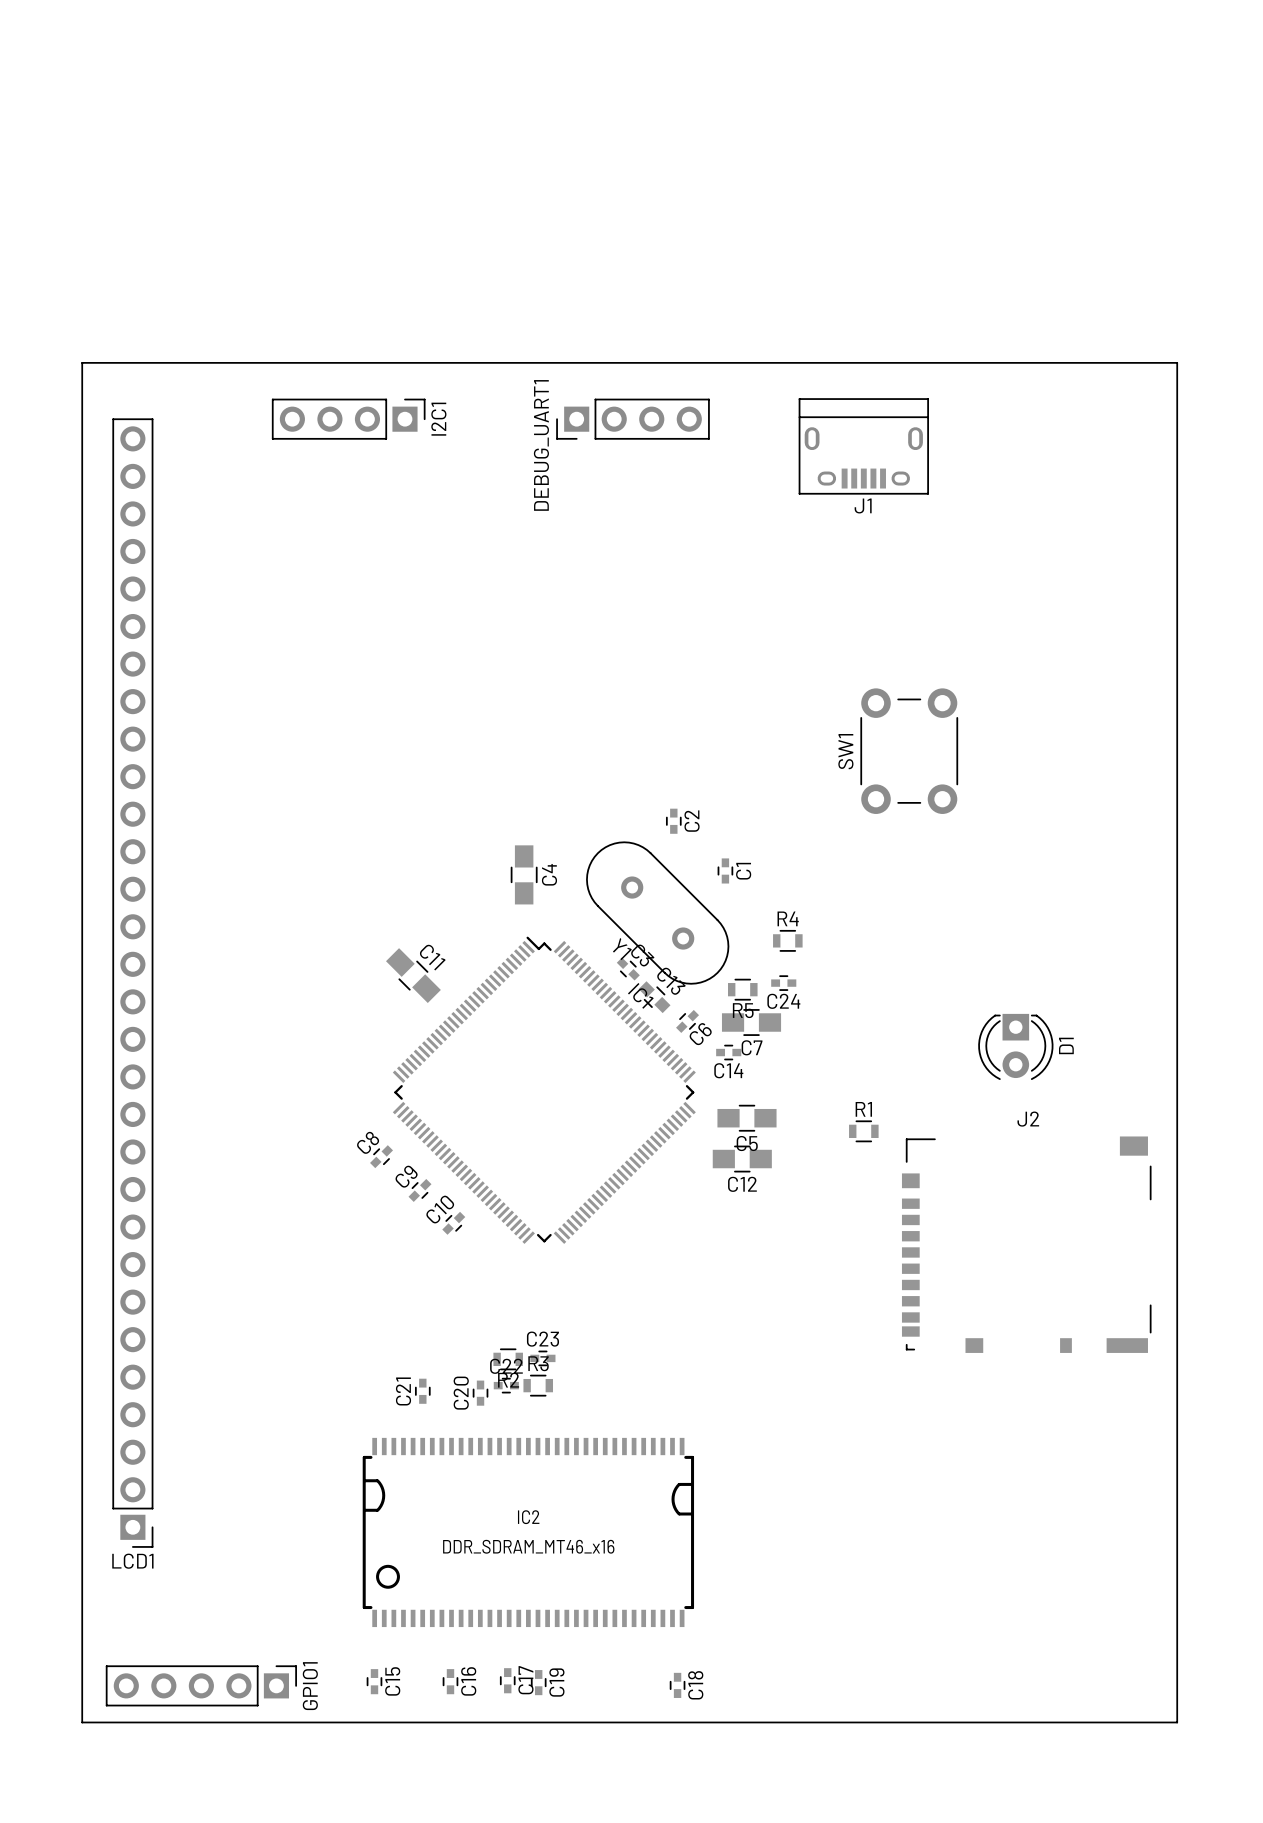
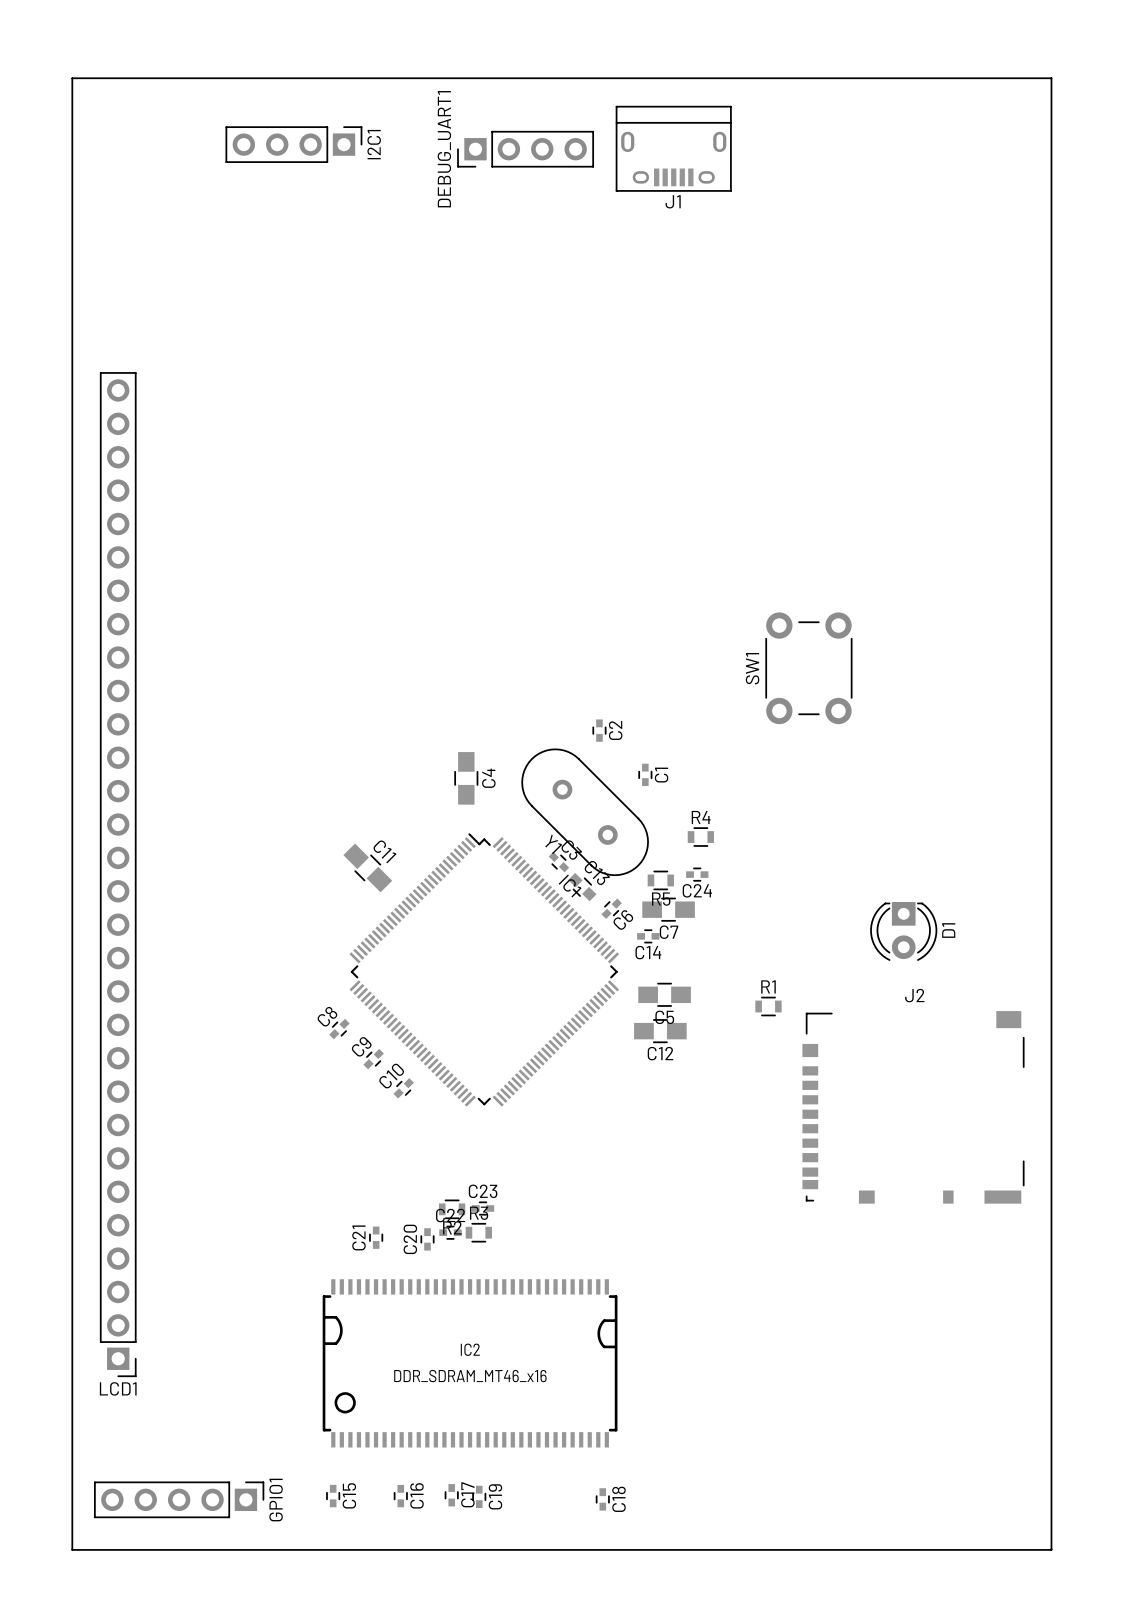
board edge: (82, 362) (1177, 362) (1177, 1722) (82, 1722) (82, 362) -> (72, 78) (72, 1549) (1051, 1549) (1051, 78) (72, 78)
I2C1 position: (348, 419) -> (293, 144)
DEBUG_UART1 position: (632, 419) -> (525, 149)
DEBUG_UART1 name position: DEBUG_UART1 (541, 445) -> DEBUG_UART1 (444, 149)
J1 position: (863, 446) -> (673, 148)

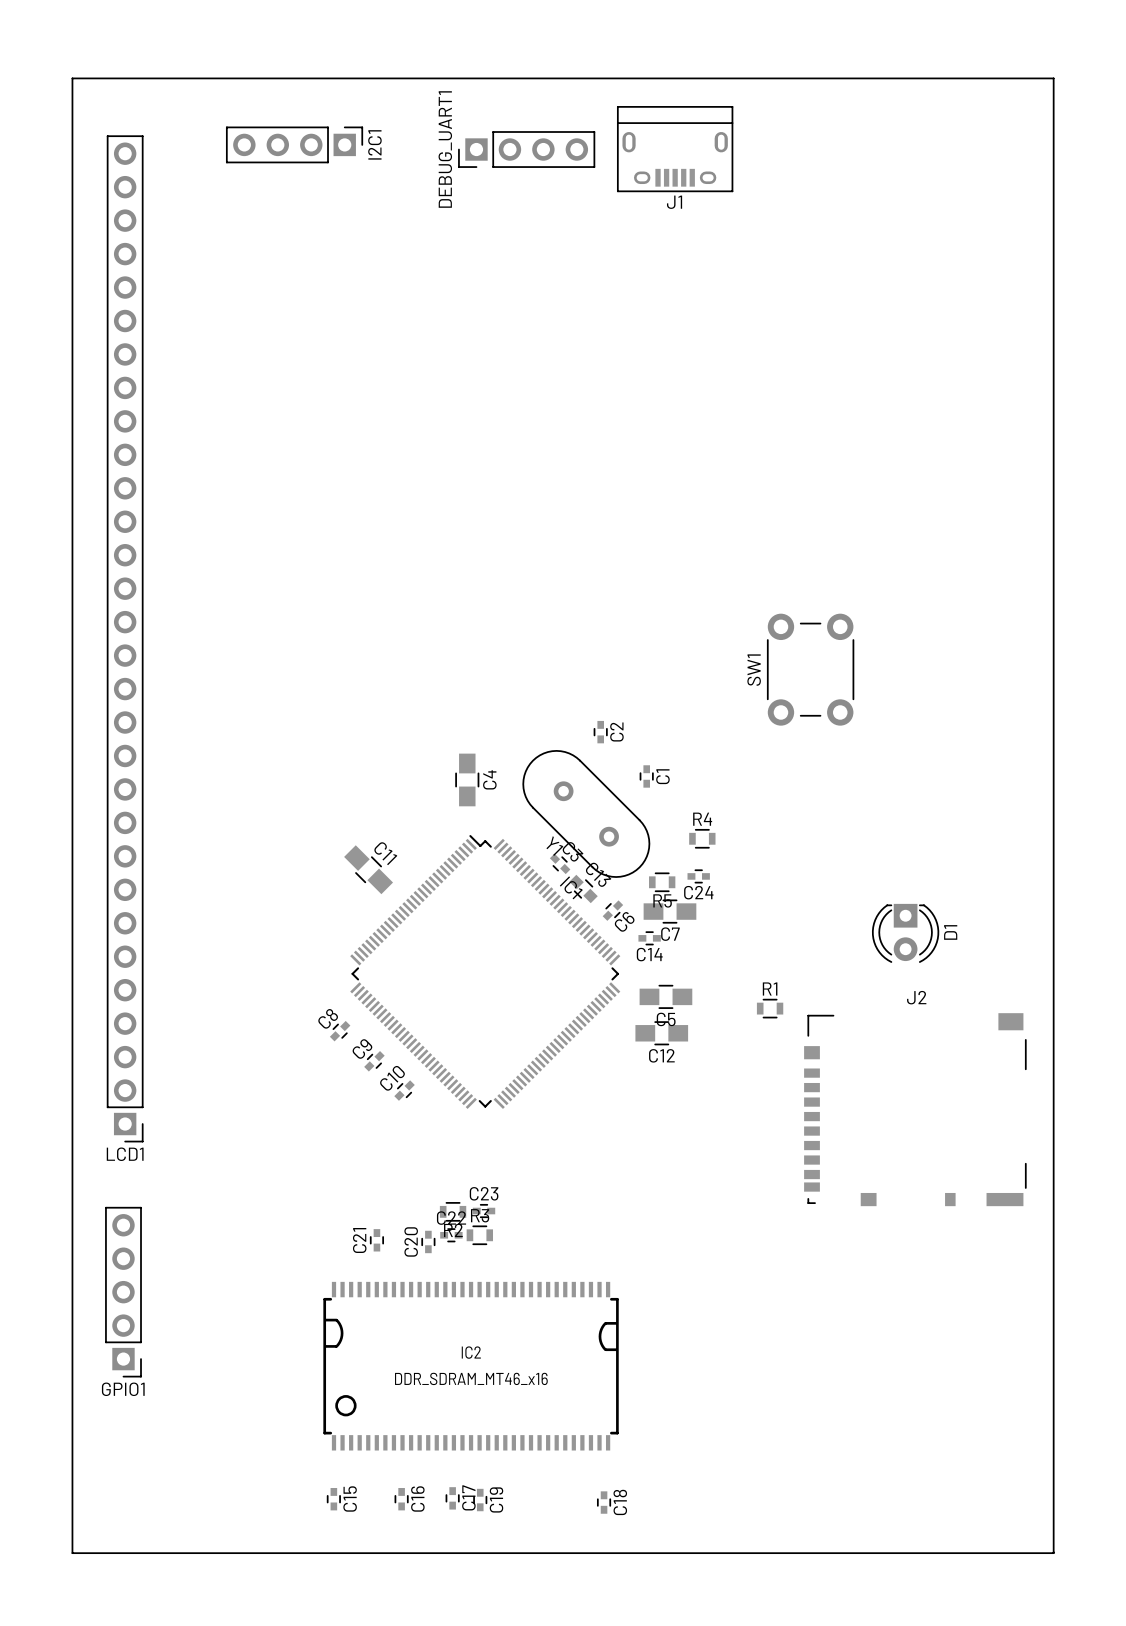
LCD1 position: (118, 874) -> (125, 638)
GPIO1 rotation: 0° (179, 1499) -> 90° clockwise (123, 1292)
GPIO1 position: (179, 1499) -> (123, 1292)

